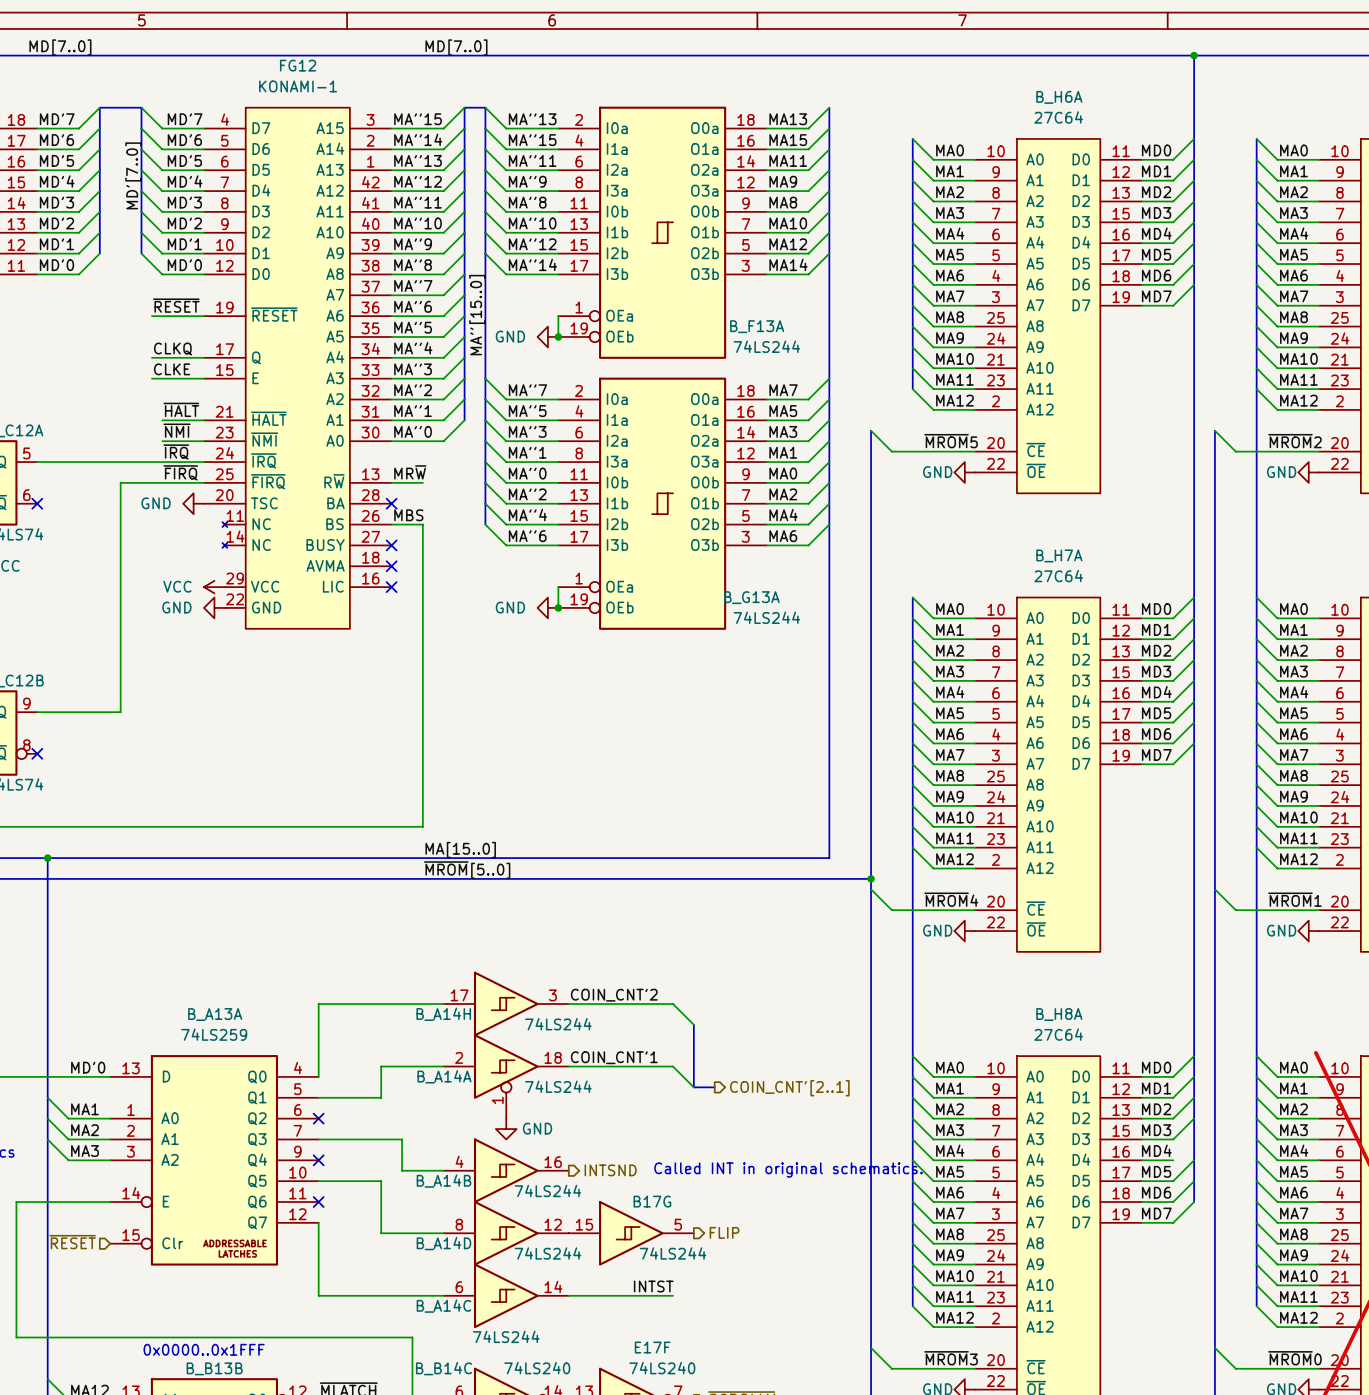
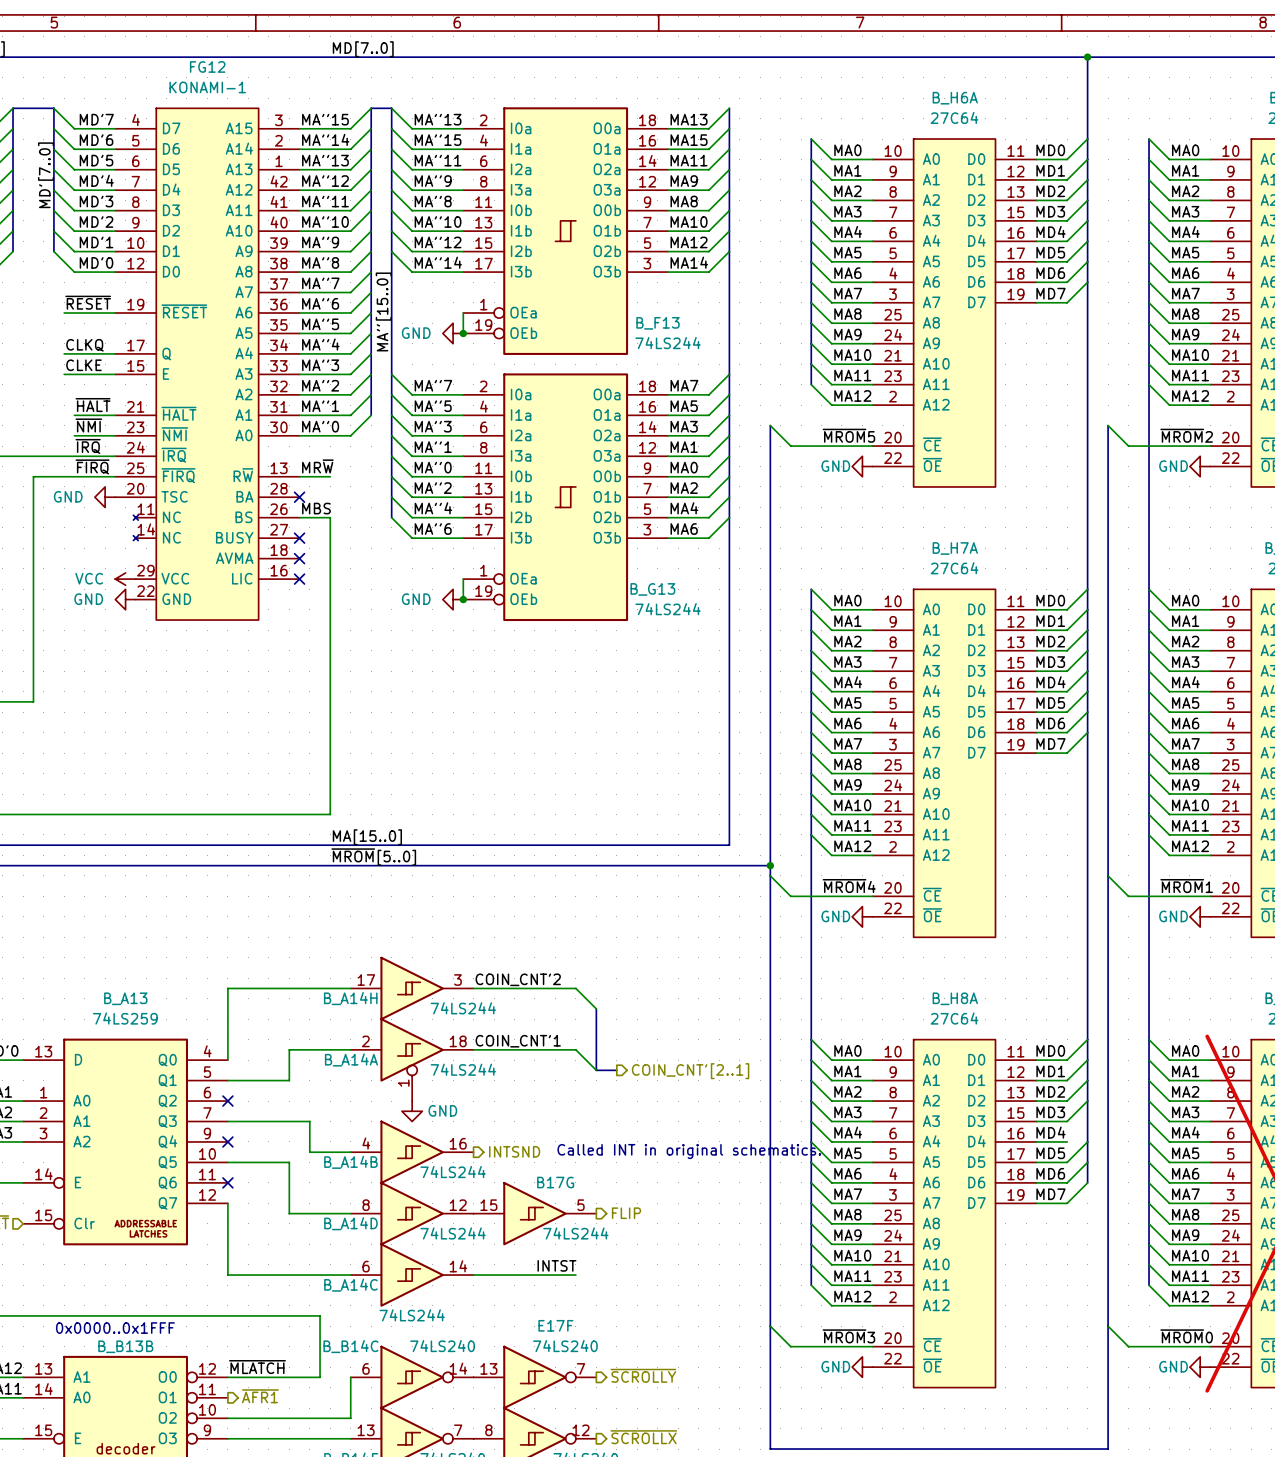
B_F13A name: B_F13A (757, 326) -> B_F13 (658, 323)
B_G13A name: B_G13A (751, 597) -> B_G13 (652, 589)
B_A13A name: B_A13A (215, 1014) -> B_A13 (125, 998)

